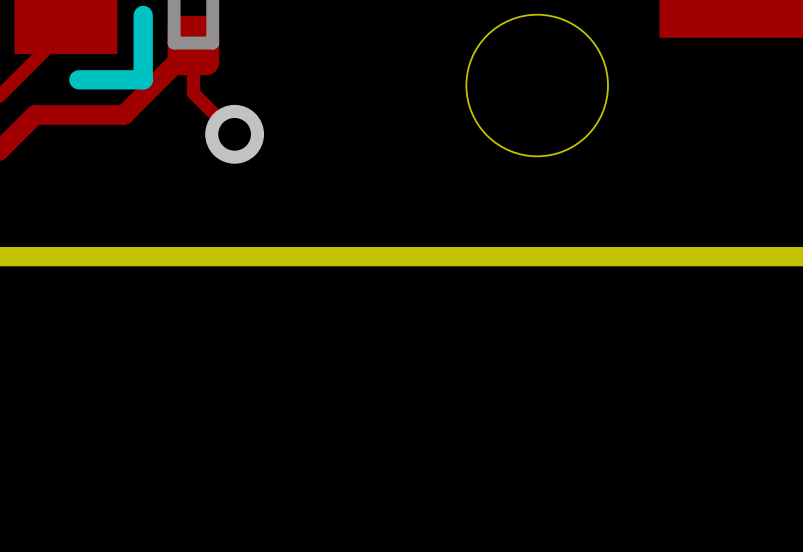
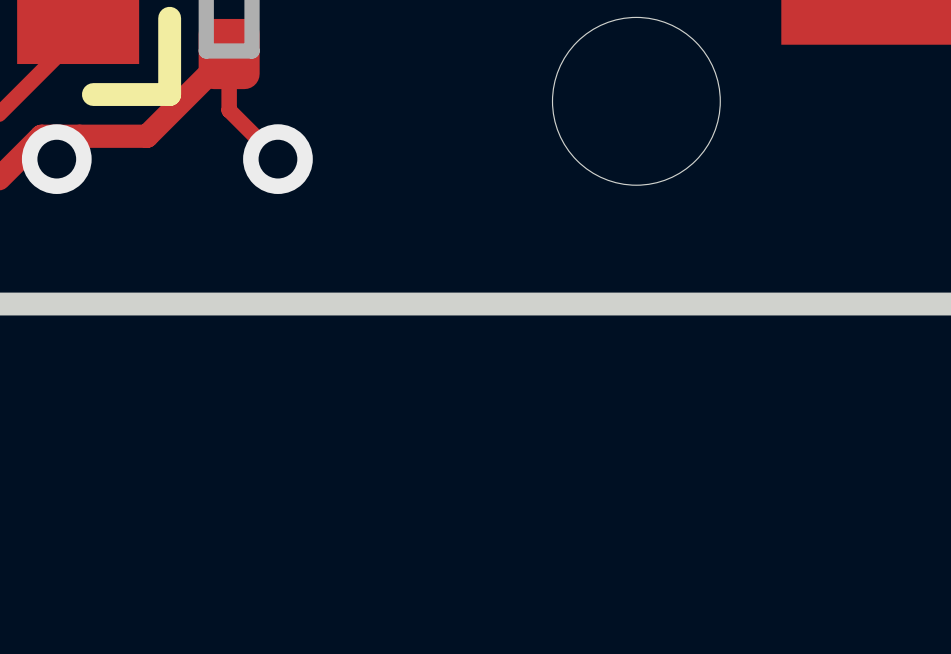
via: none -> (56, 159)

